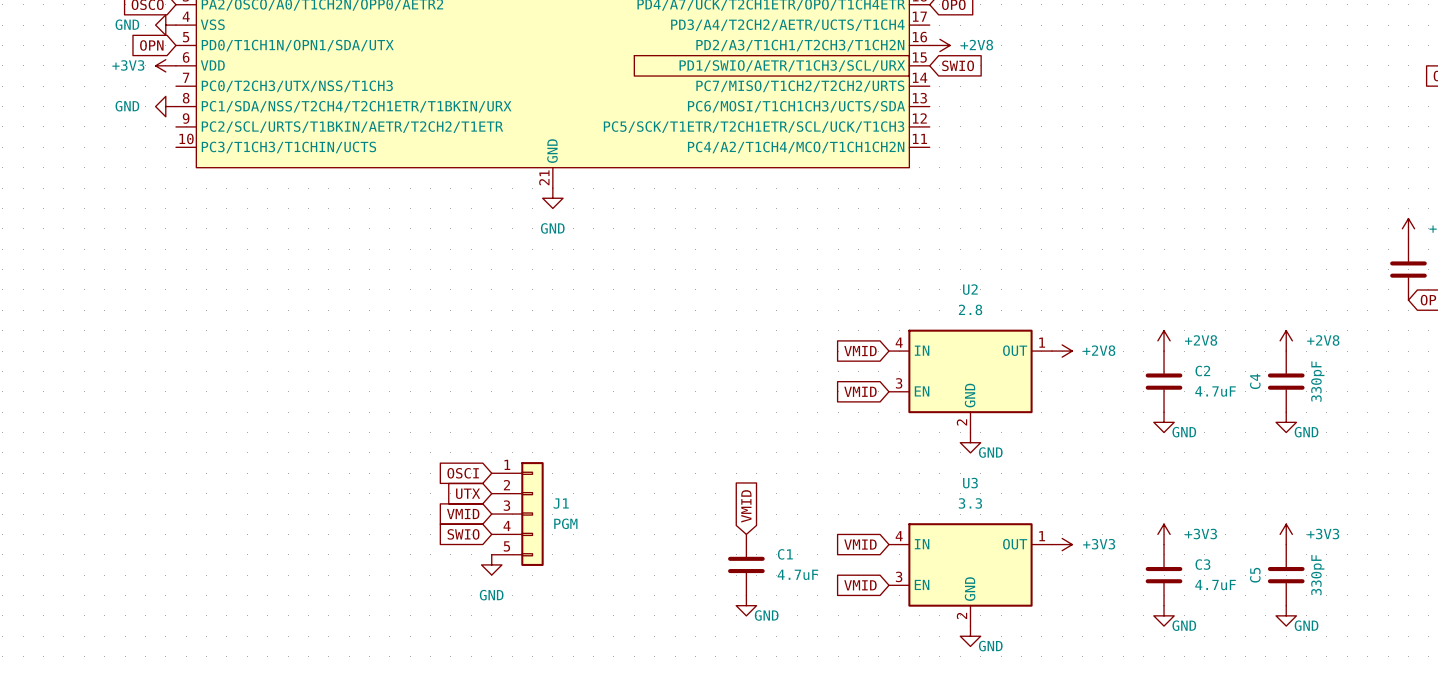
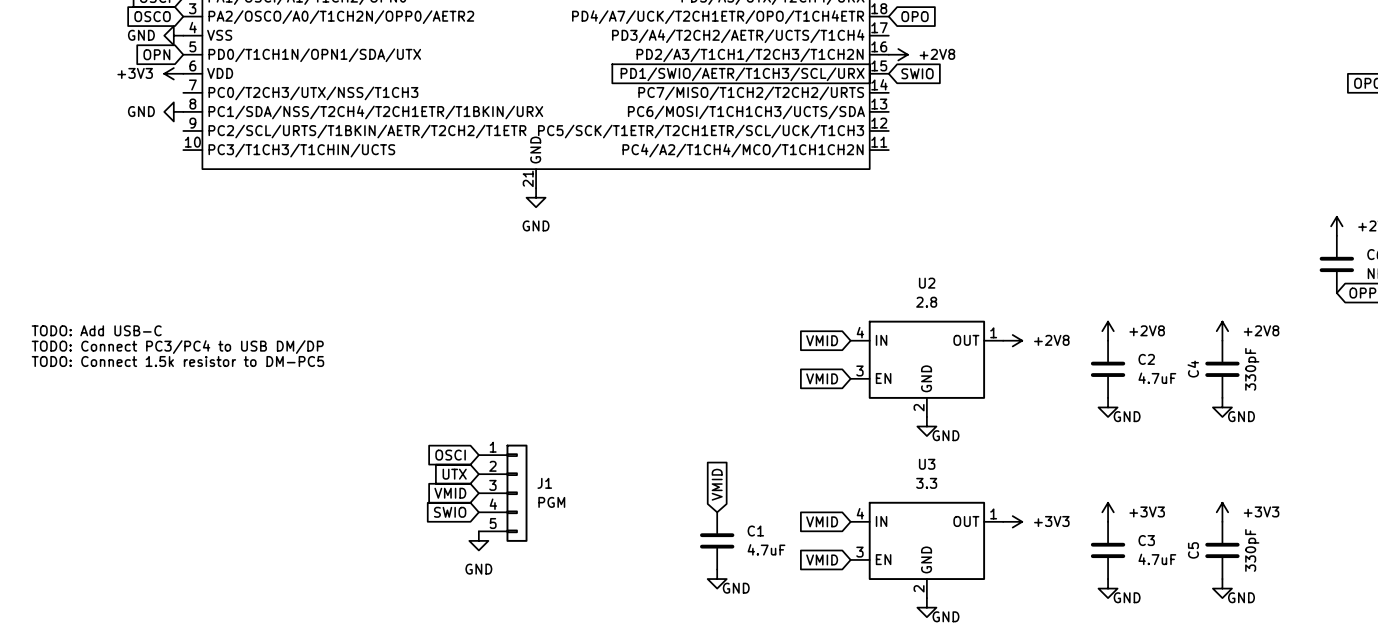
text: none -> TODO: Add USB-C (96, 330)
text: none -> TODO: Connect PC3/PC4 to USB DM/DP (177, 347)
text: none -> TODO: Connect 1.5k resistor to DM-PC5 (177, 361)

